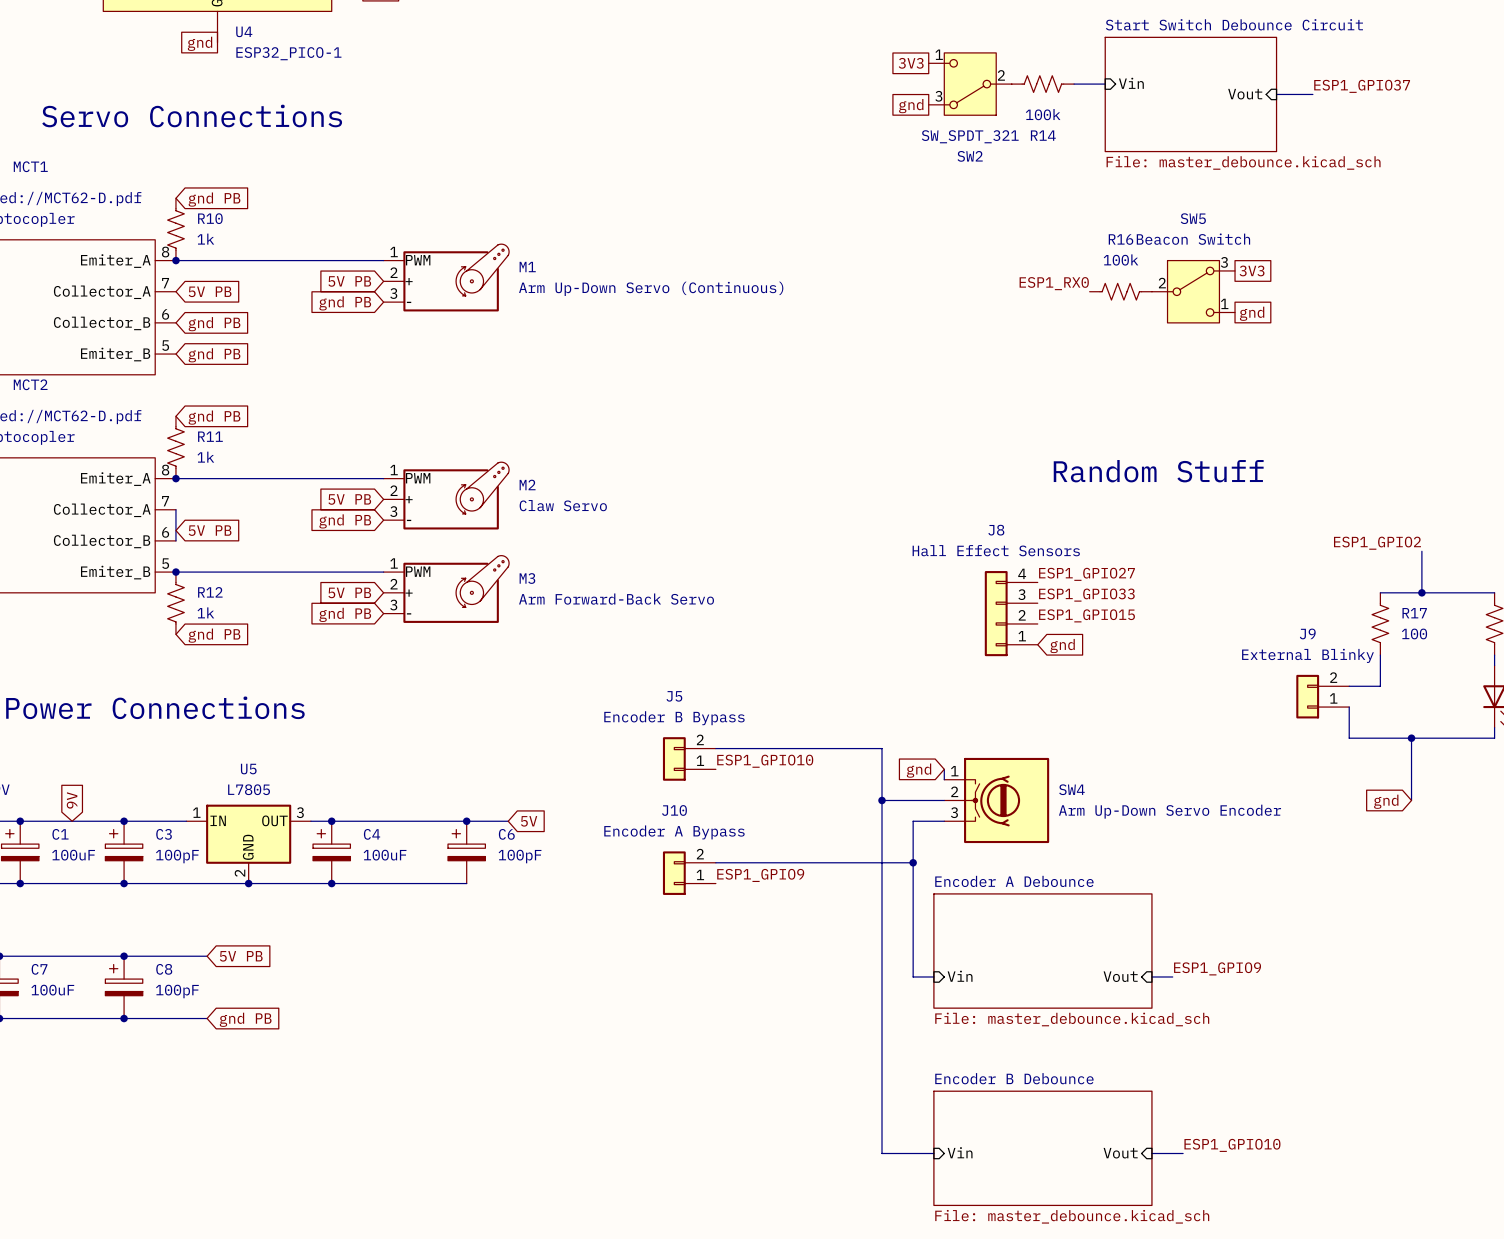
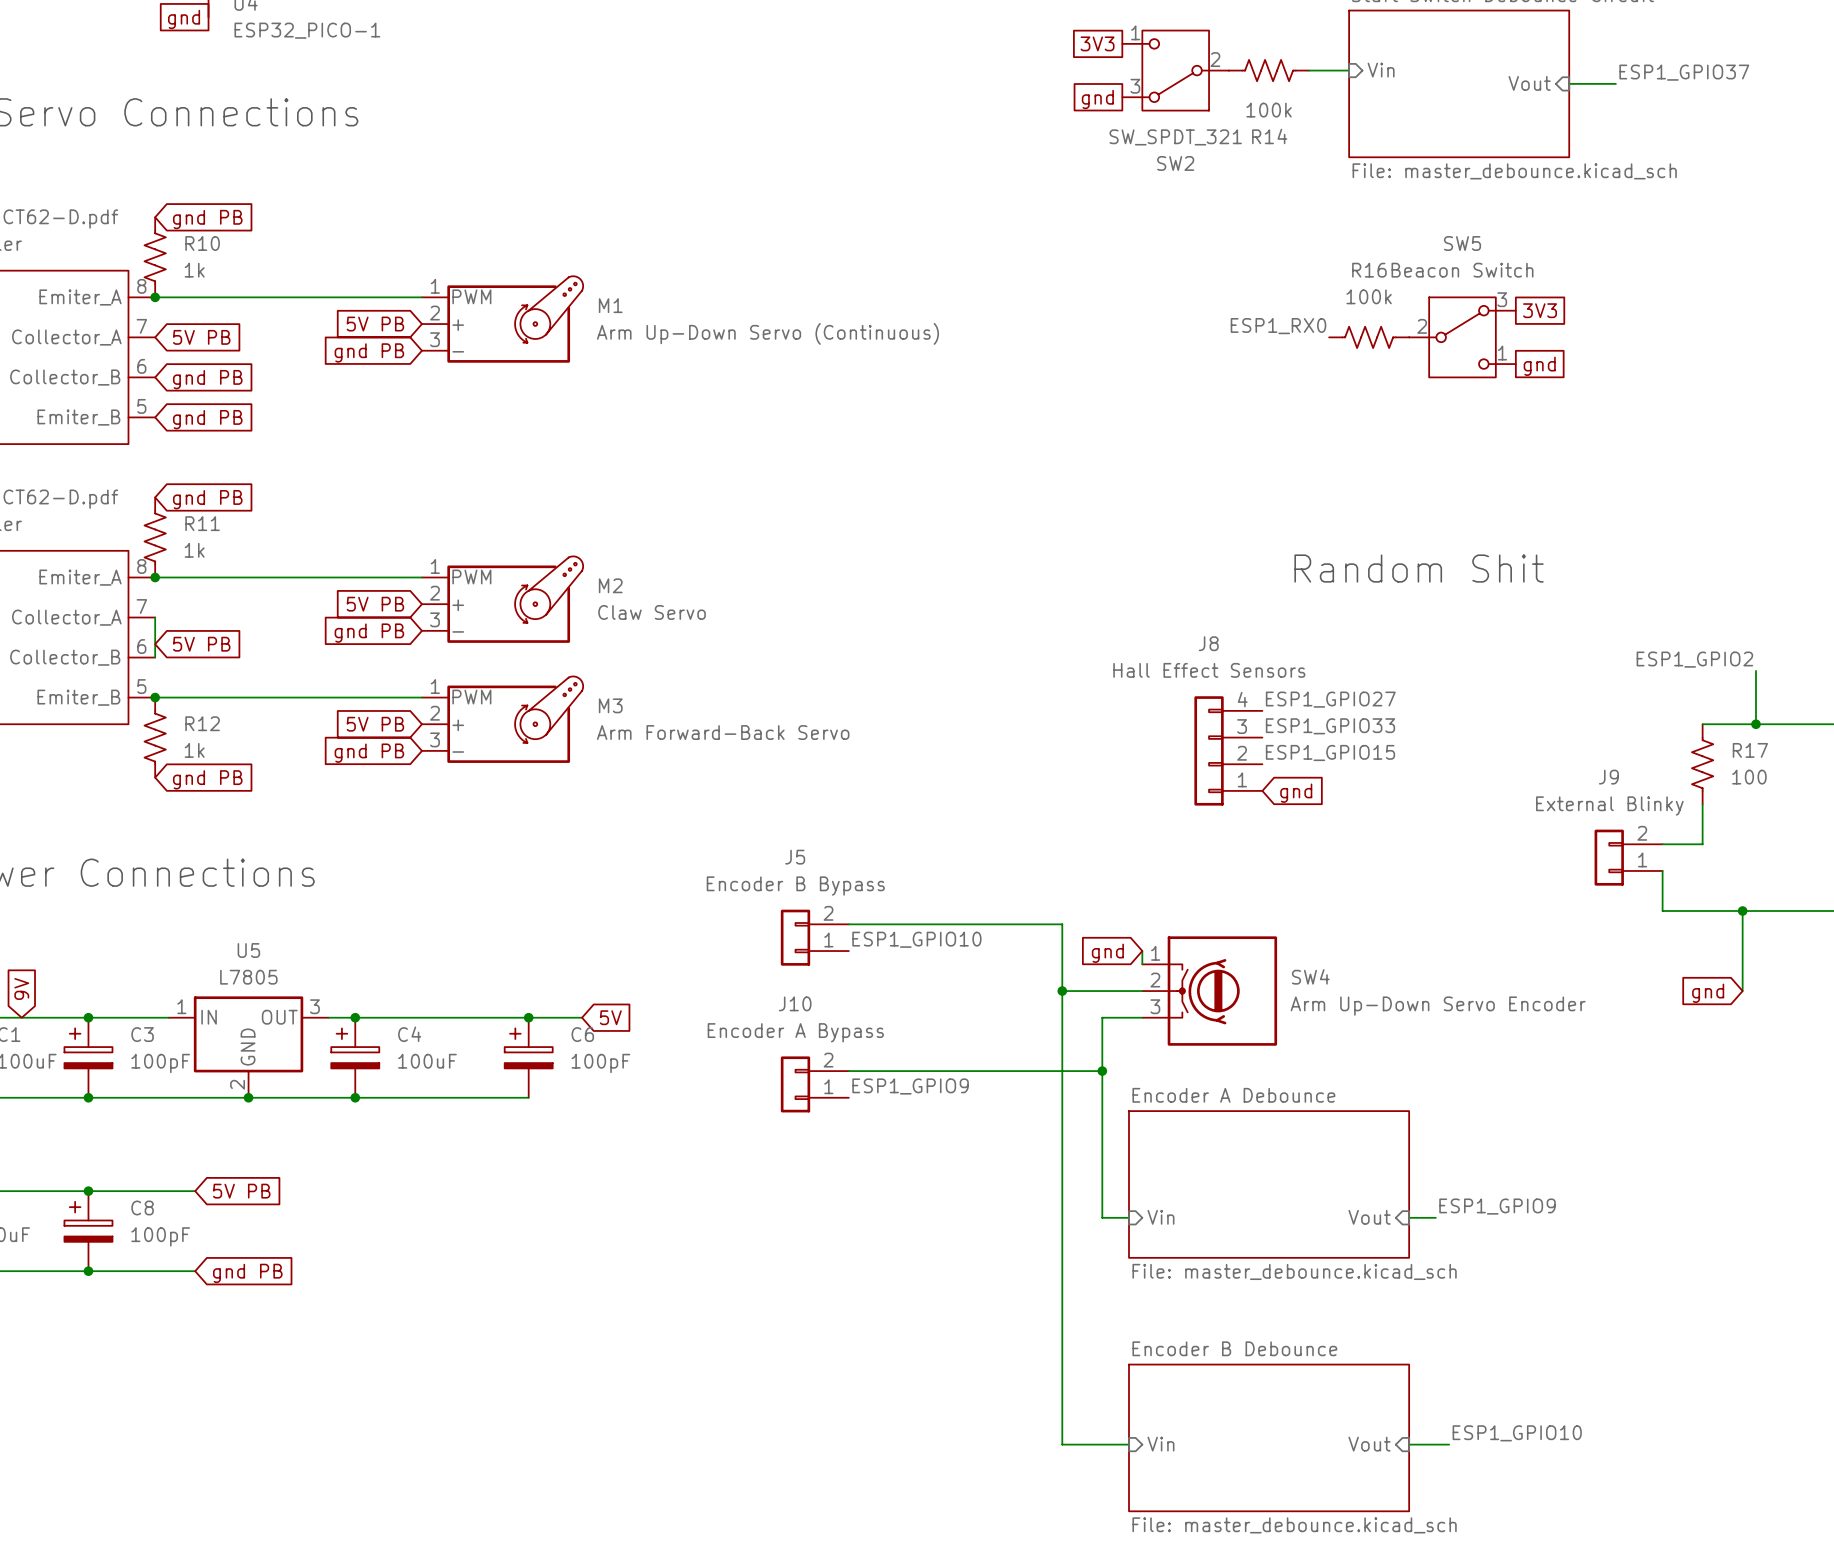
text: Random Stuff (1158, 471) -> Random Shit (1419, 568)

